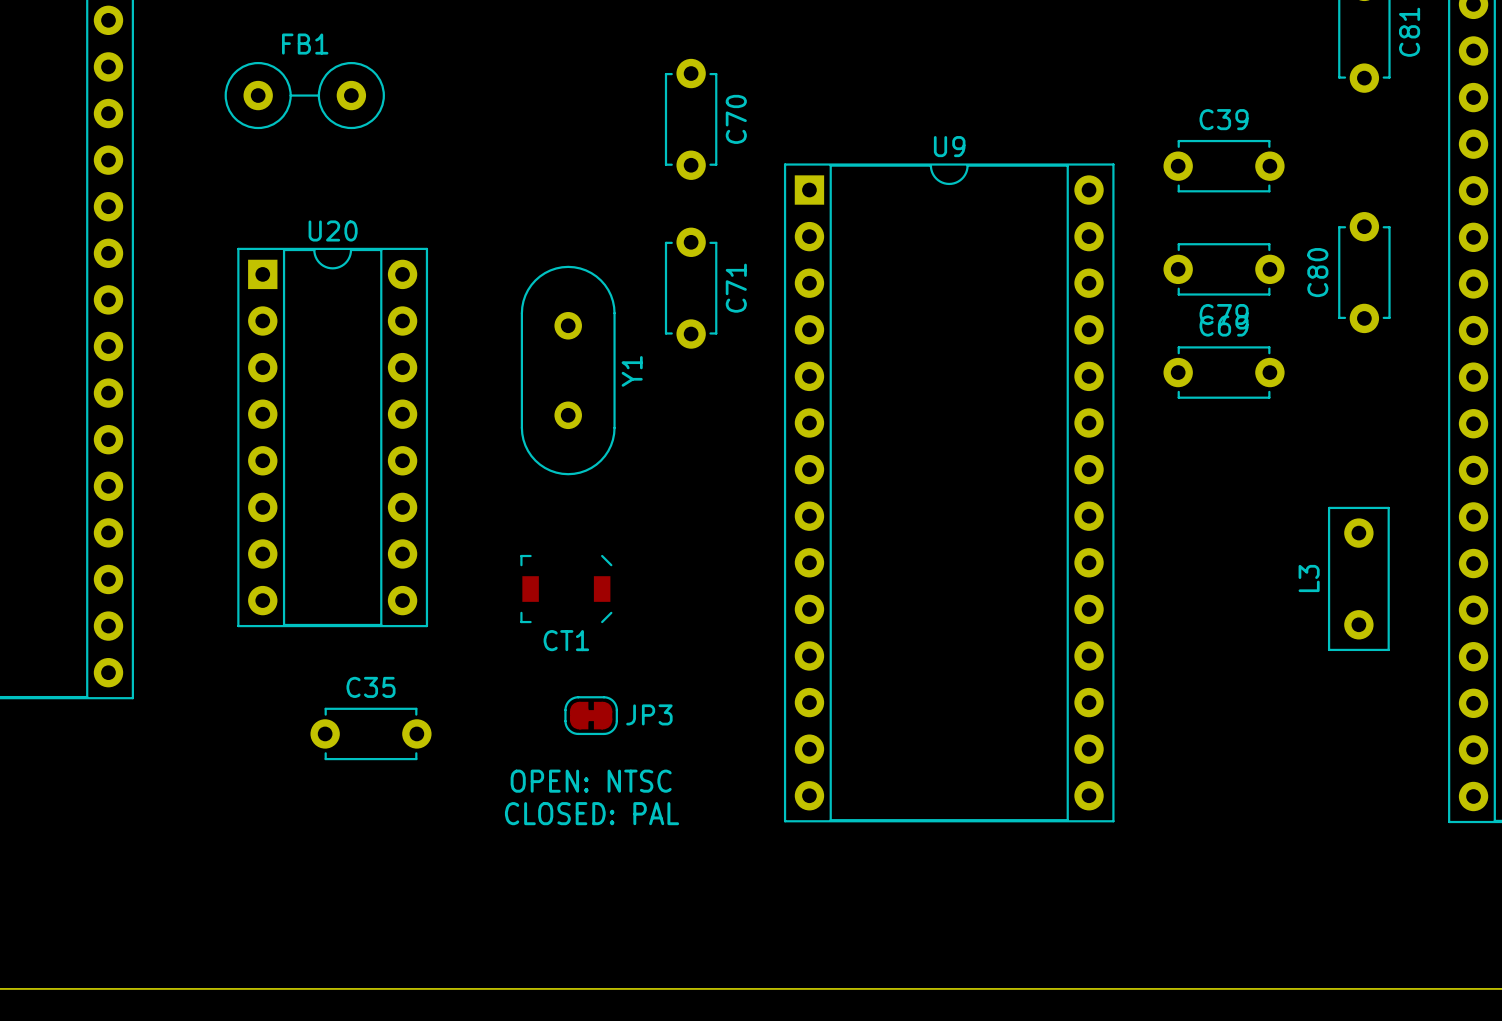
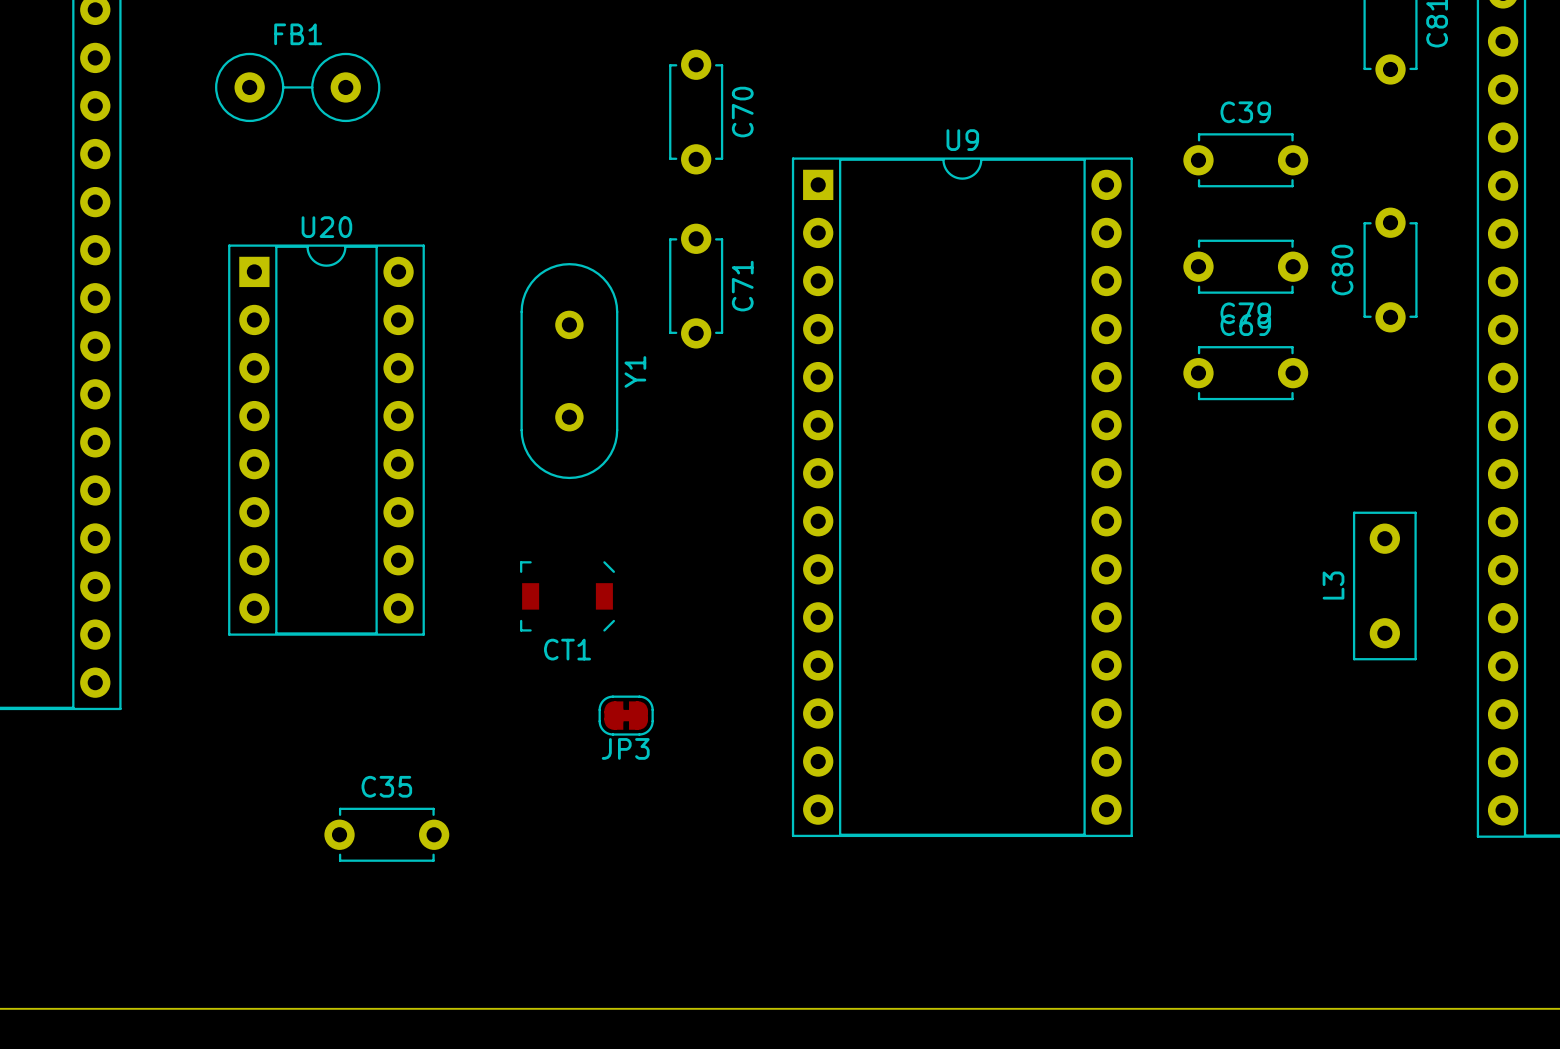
JP3 name position: JP3 (649, 714) -> JP3 (625, 748)
JP3 position: (591, 715) -> (626, 715)
C35 position: (371, 733) -> (386, 834)
text: OPEN: NTSC (591, 781) -> none
text: CLOSED: PAL (592, 813) -> none

